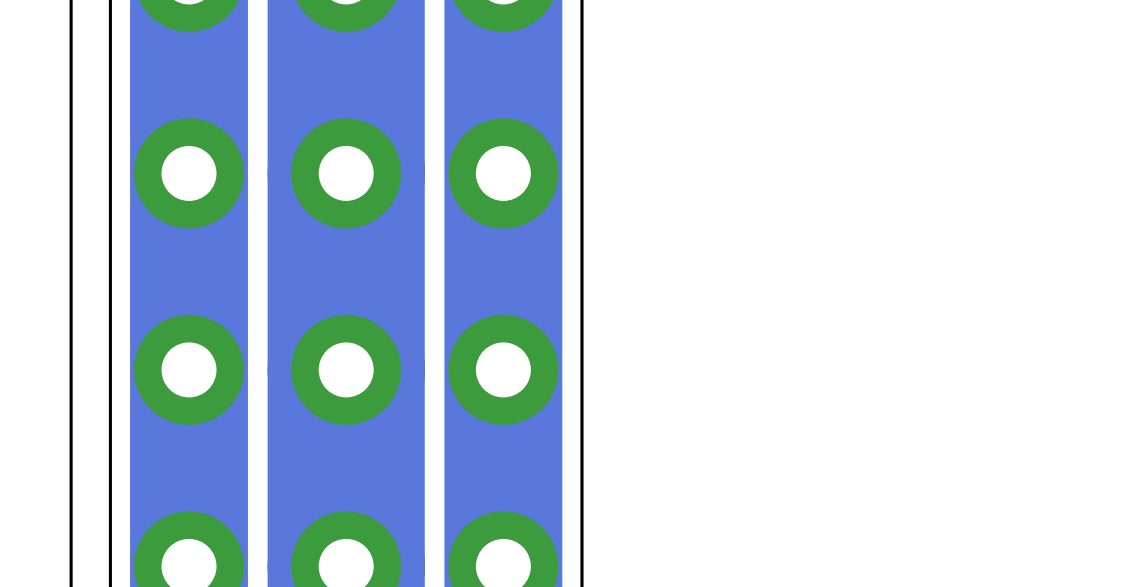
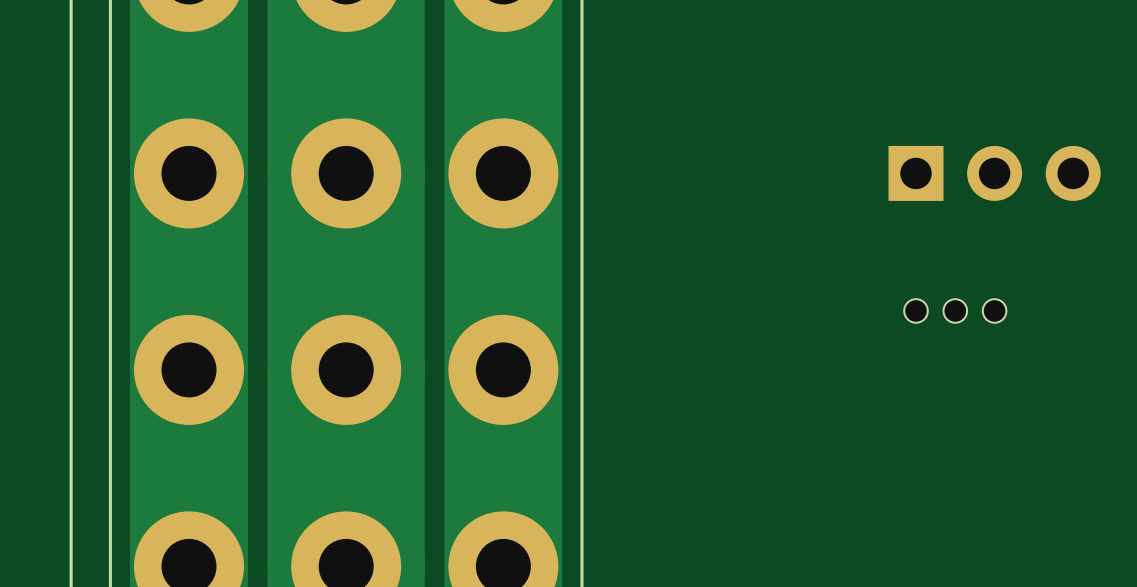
part: none -> (994, 173)
part: none -> (955, 310)

